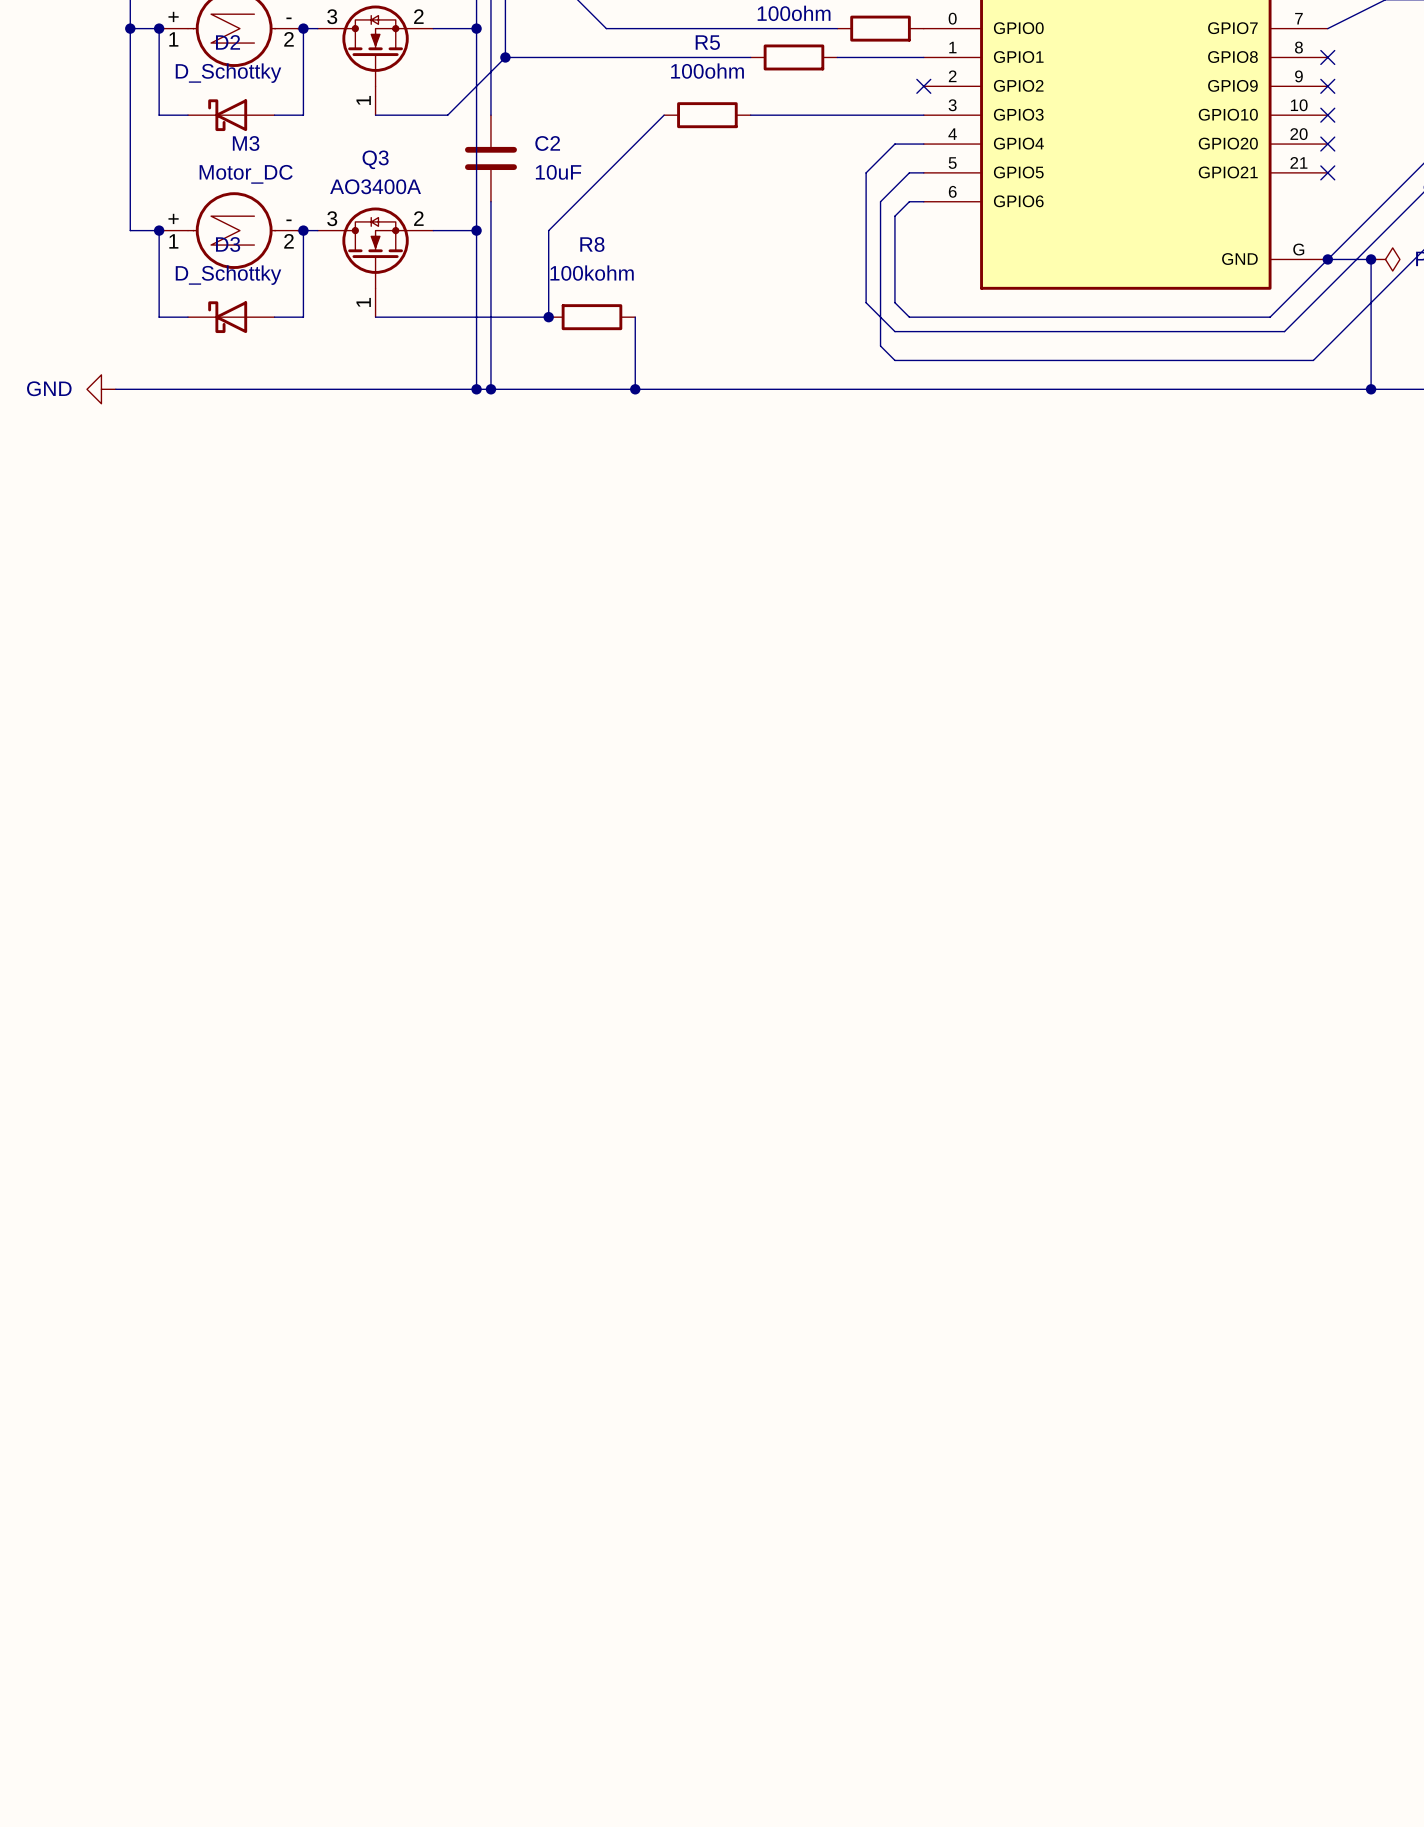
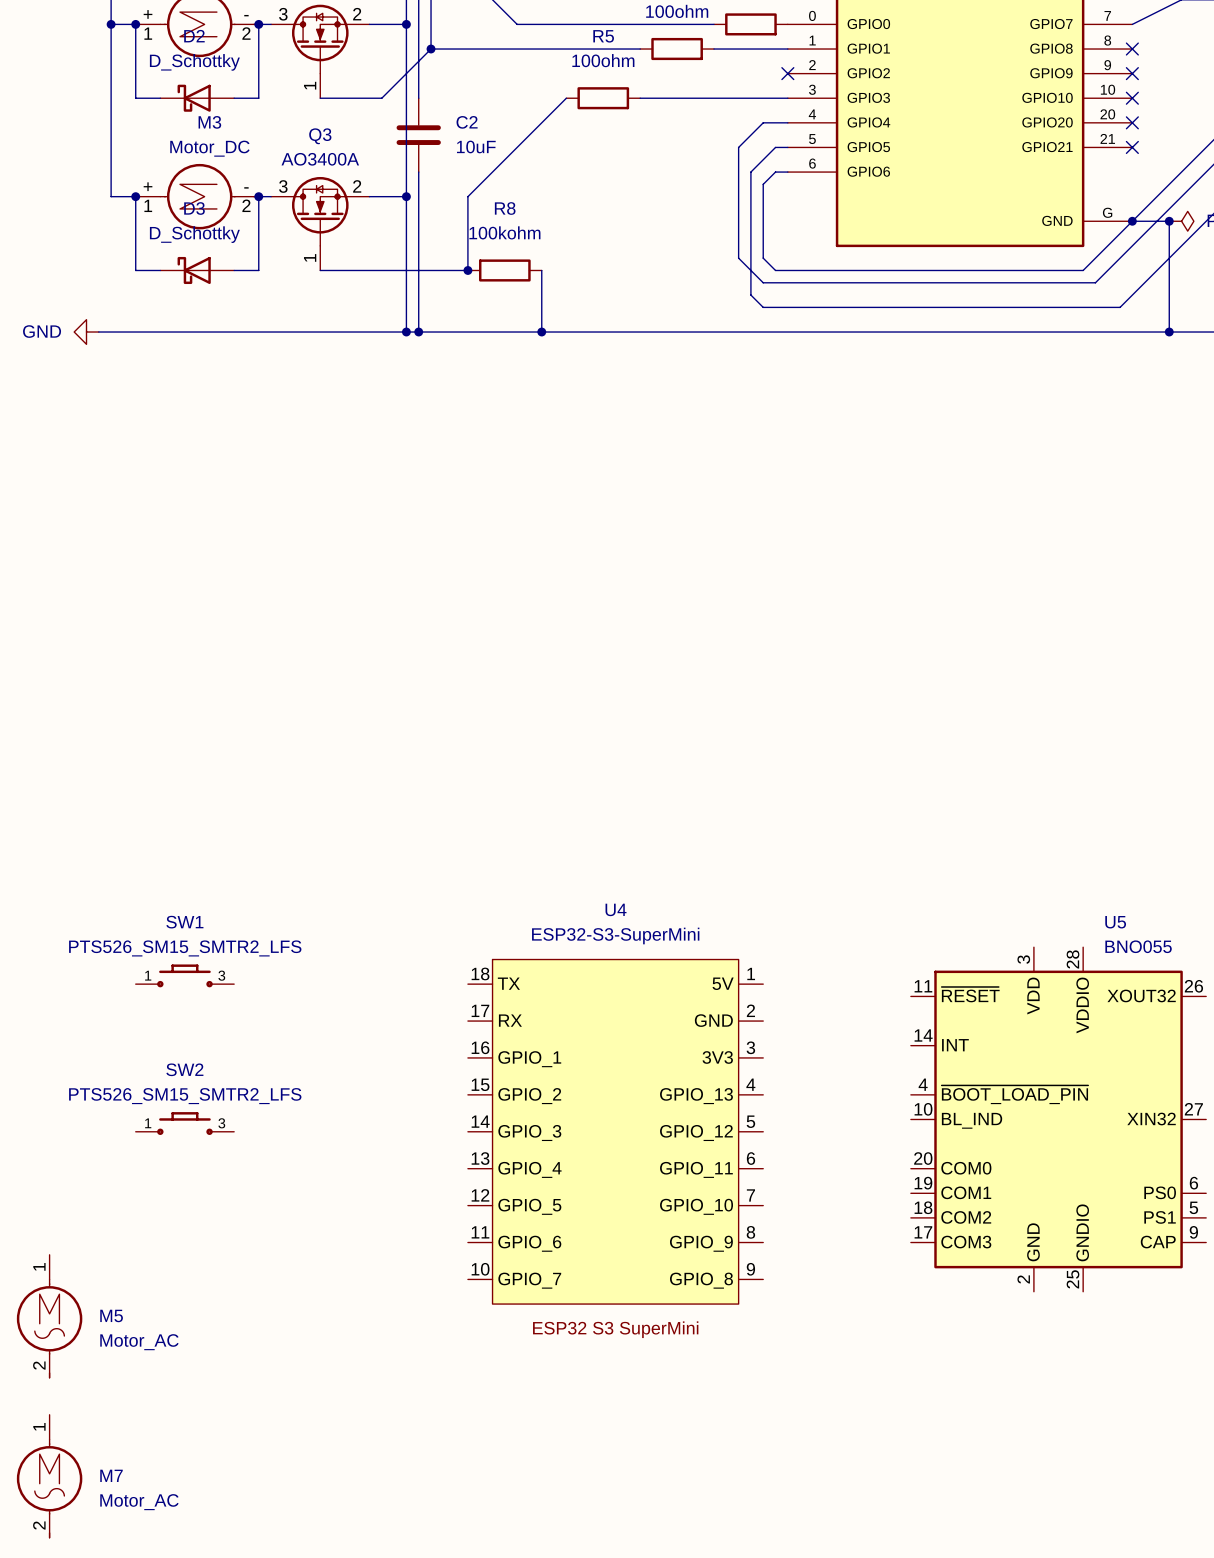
SW1: none -> PTS526_SM15_SMTR2_LFS (184, 975)
U5: none -> BNO055 (1058, 1119)
SW2: none -> PTS526_SM15_SMTR2_LFS (184, 1123)
U4: none -> ESP32-S3-SuperMini (615, 1131)
M5: none -> Motor_AC (49, 1316)
M7: none -> Motor_AC (49, 1476)

